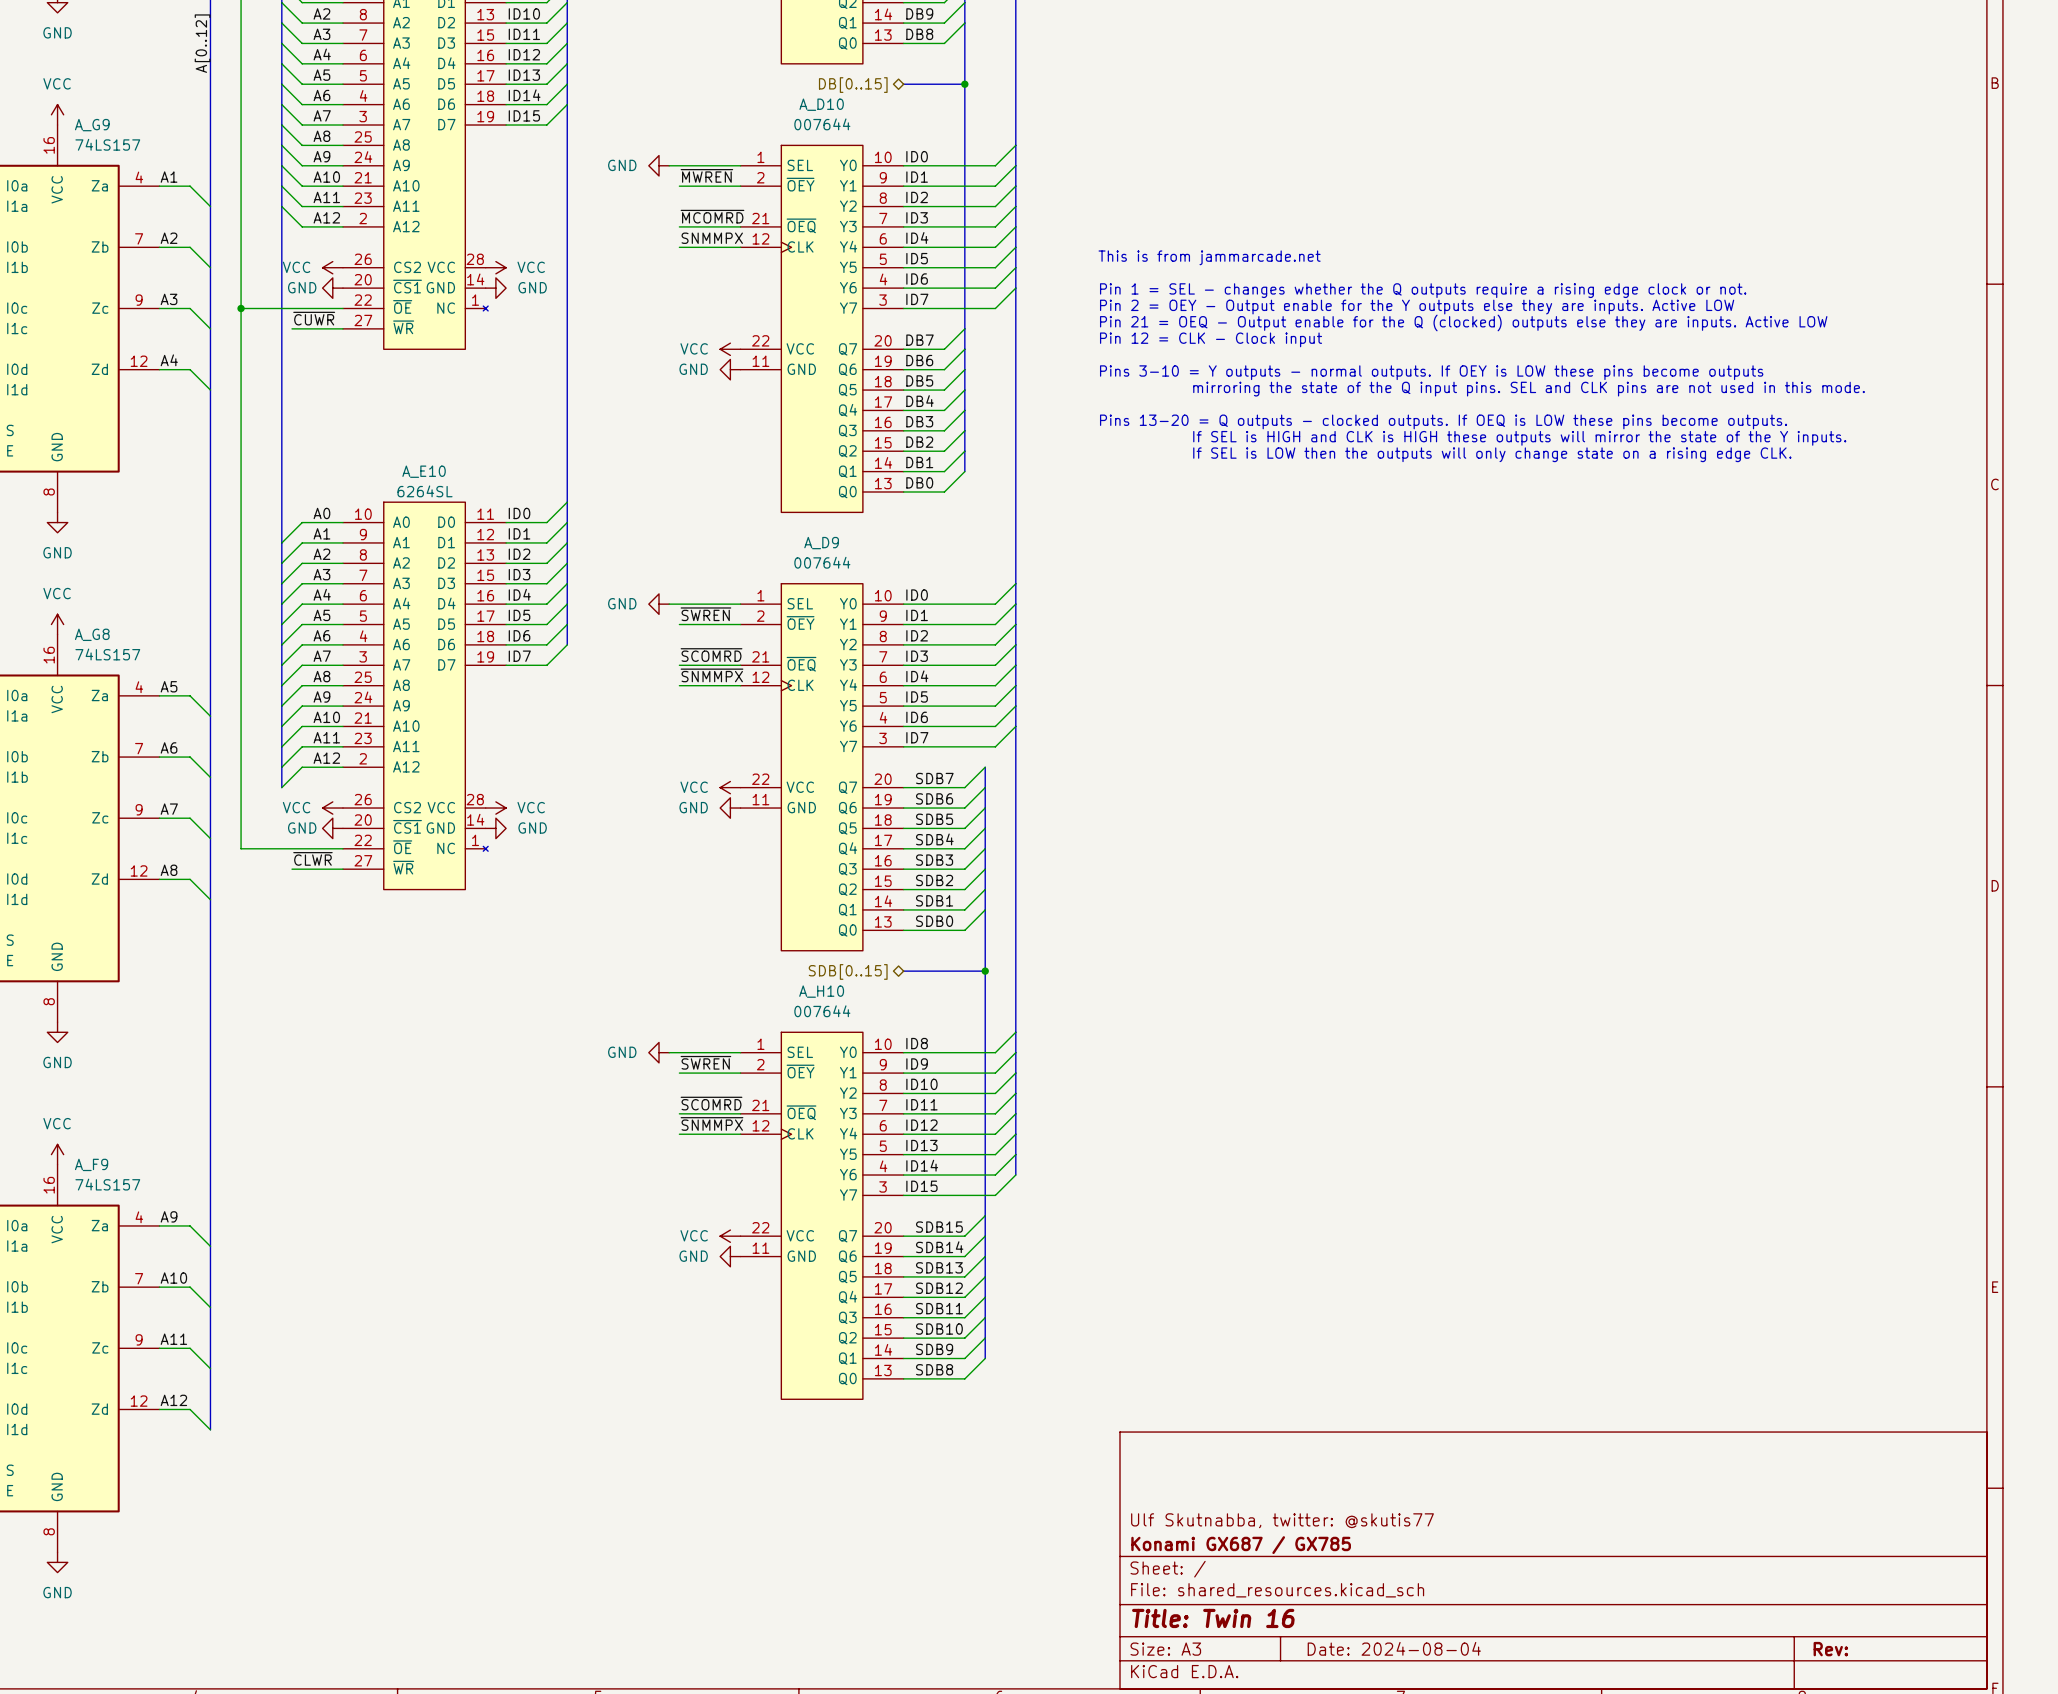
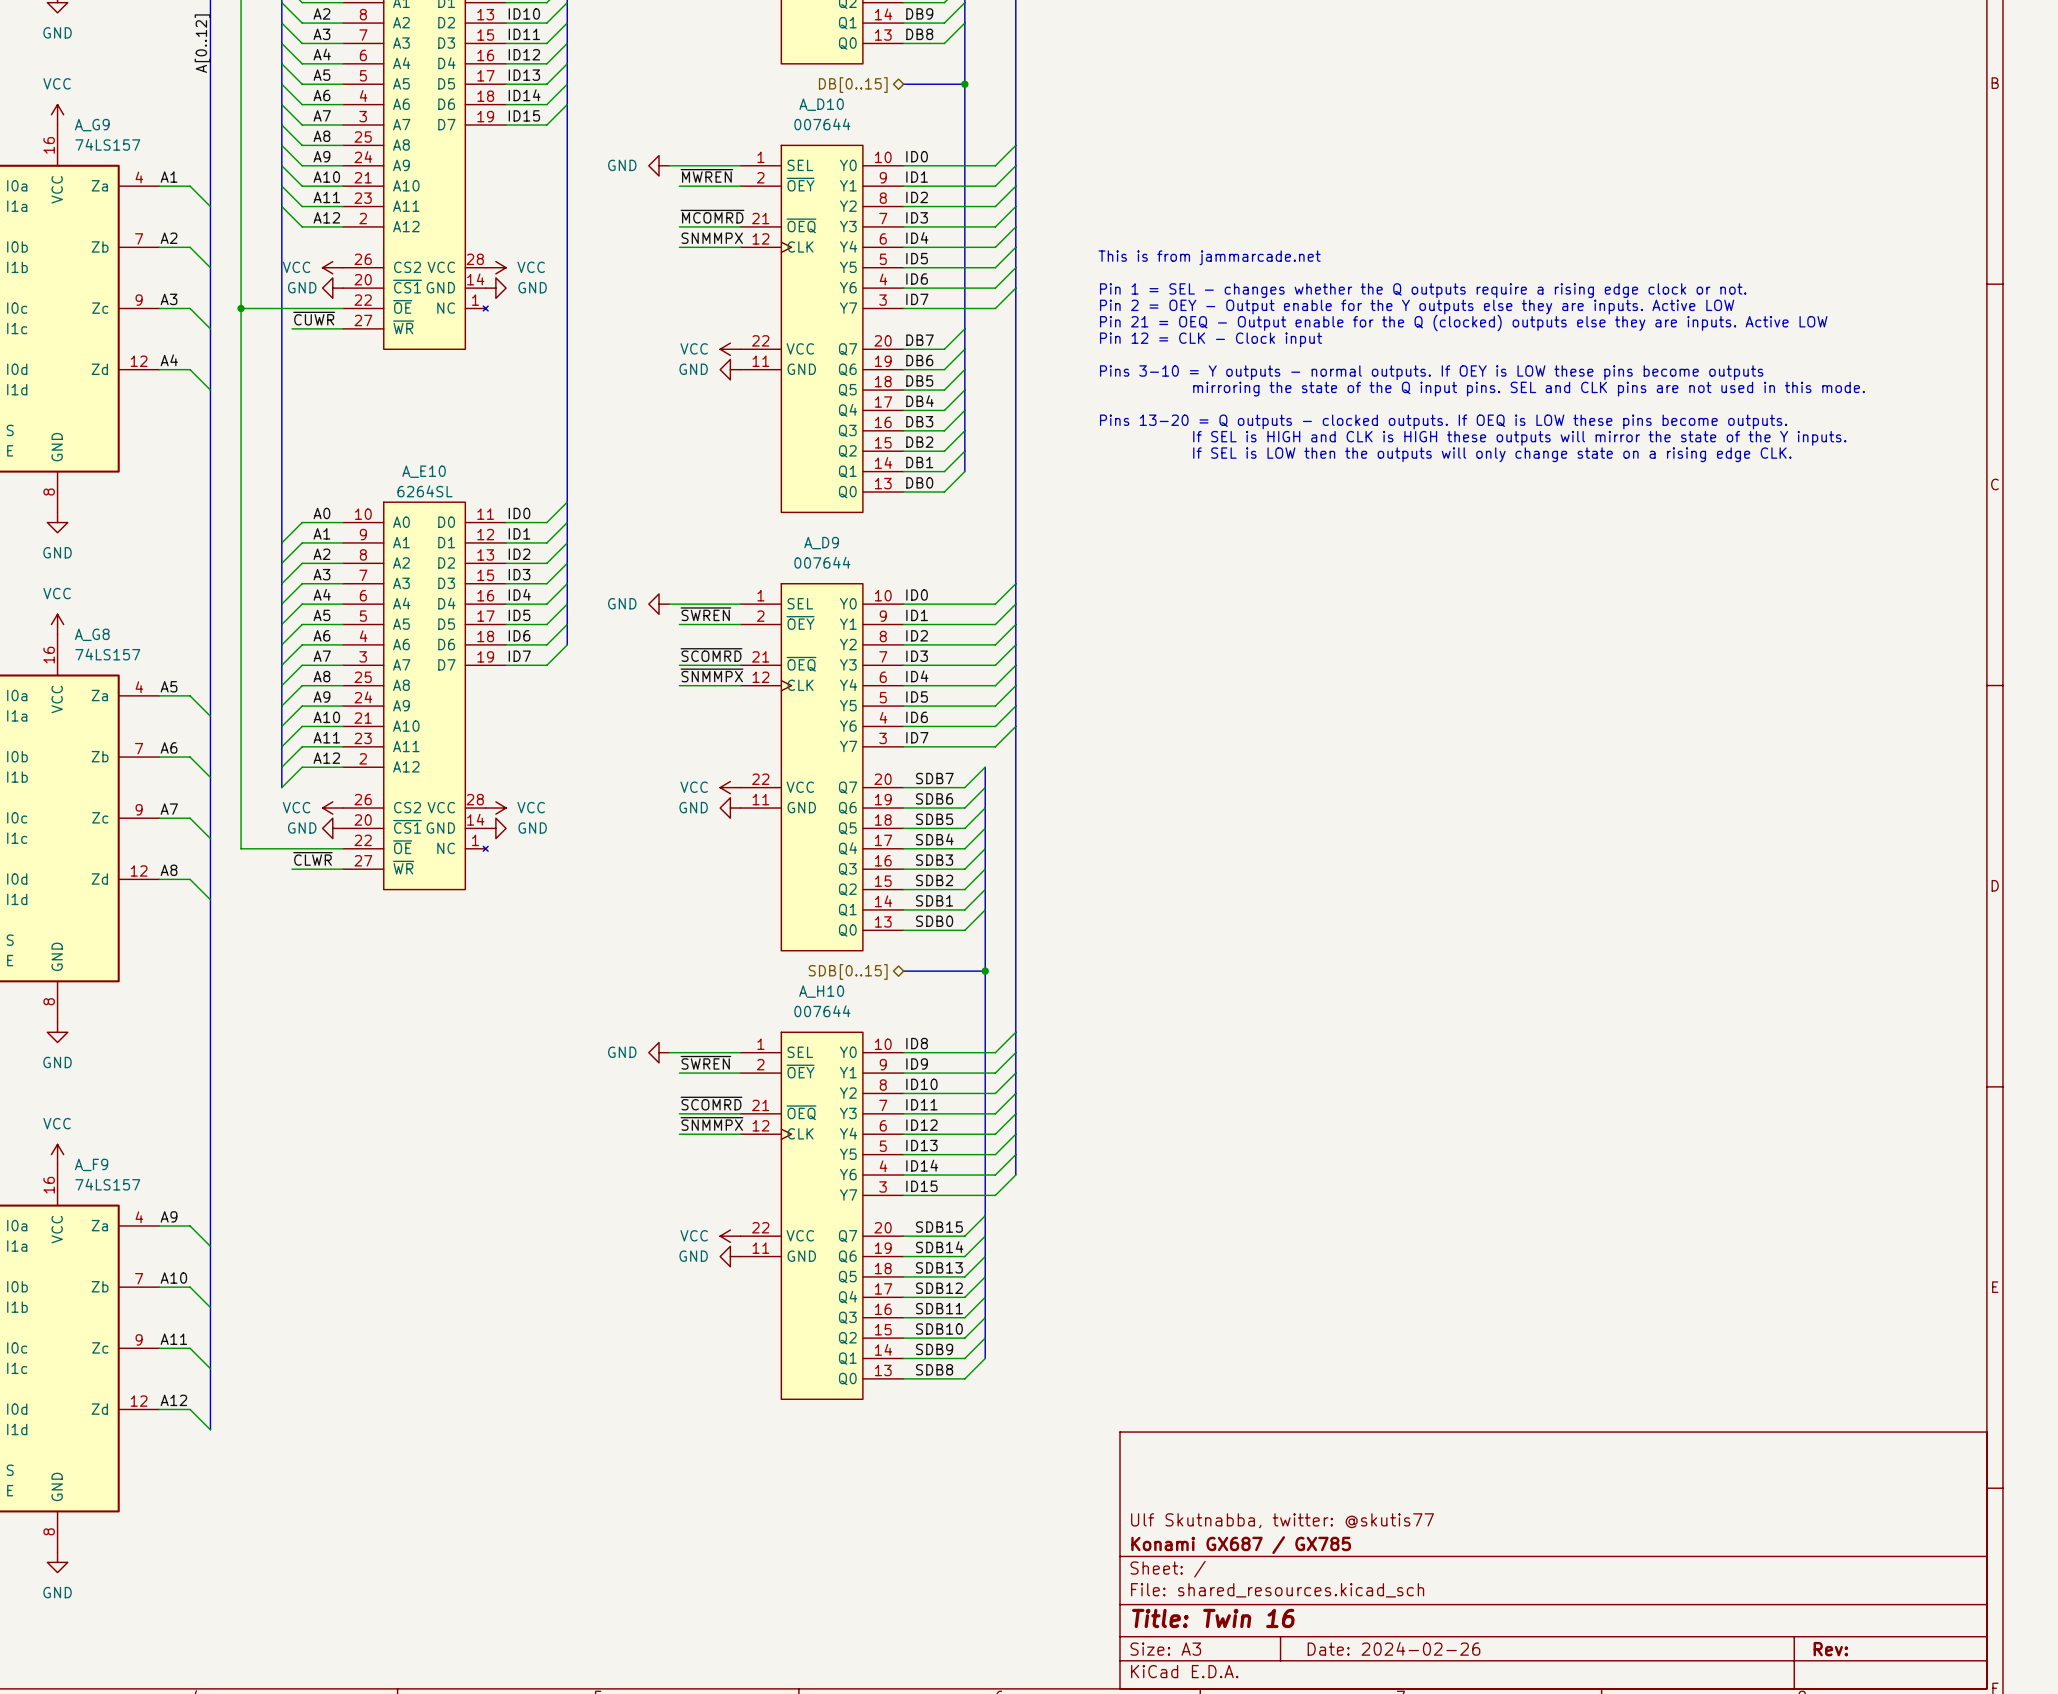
title block: Date: 2024-08-04 (1394, 1648) -> Date: 2024-02-26 (1394, 1648)

